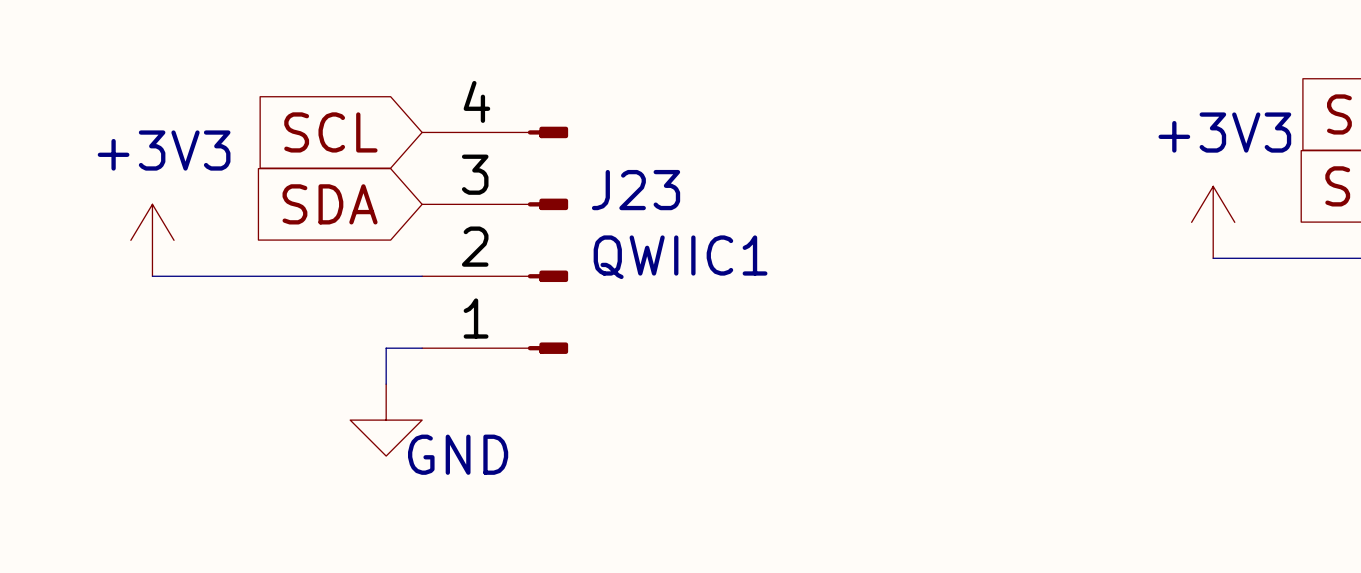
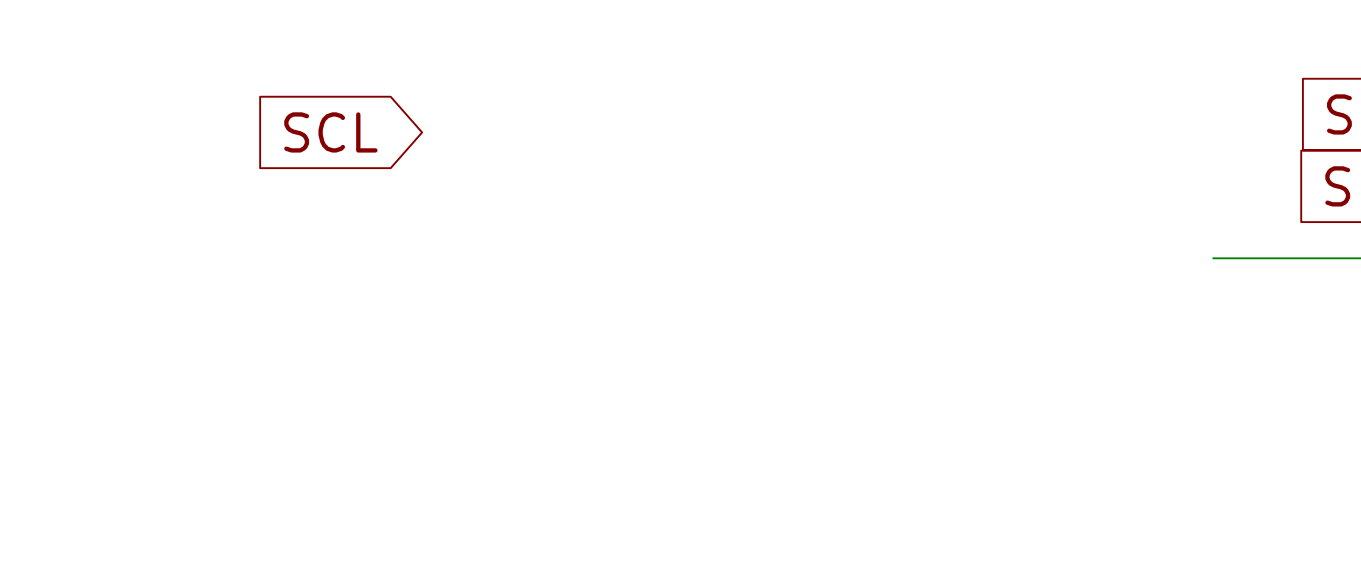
global label: SDA (330, 204) -> none
power symbol: +3V3 (1213, 222) -> none
power symbol: +3V3 (152, 240) -> none
J23: QWIIC1 (495, 240) -> none
wire: (152, 276) (422, 276) -> none
wire: (422, 348) (386, 348) (386, 384) -> none
power symbol: GND (386, 420) -> none

